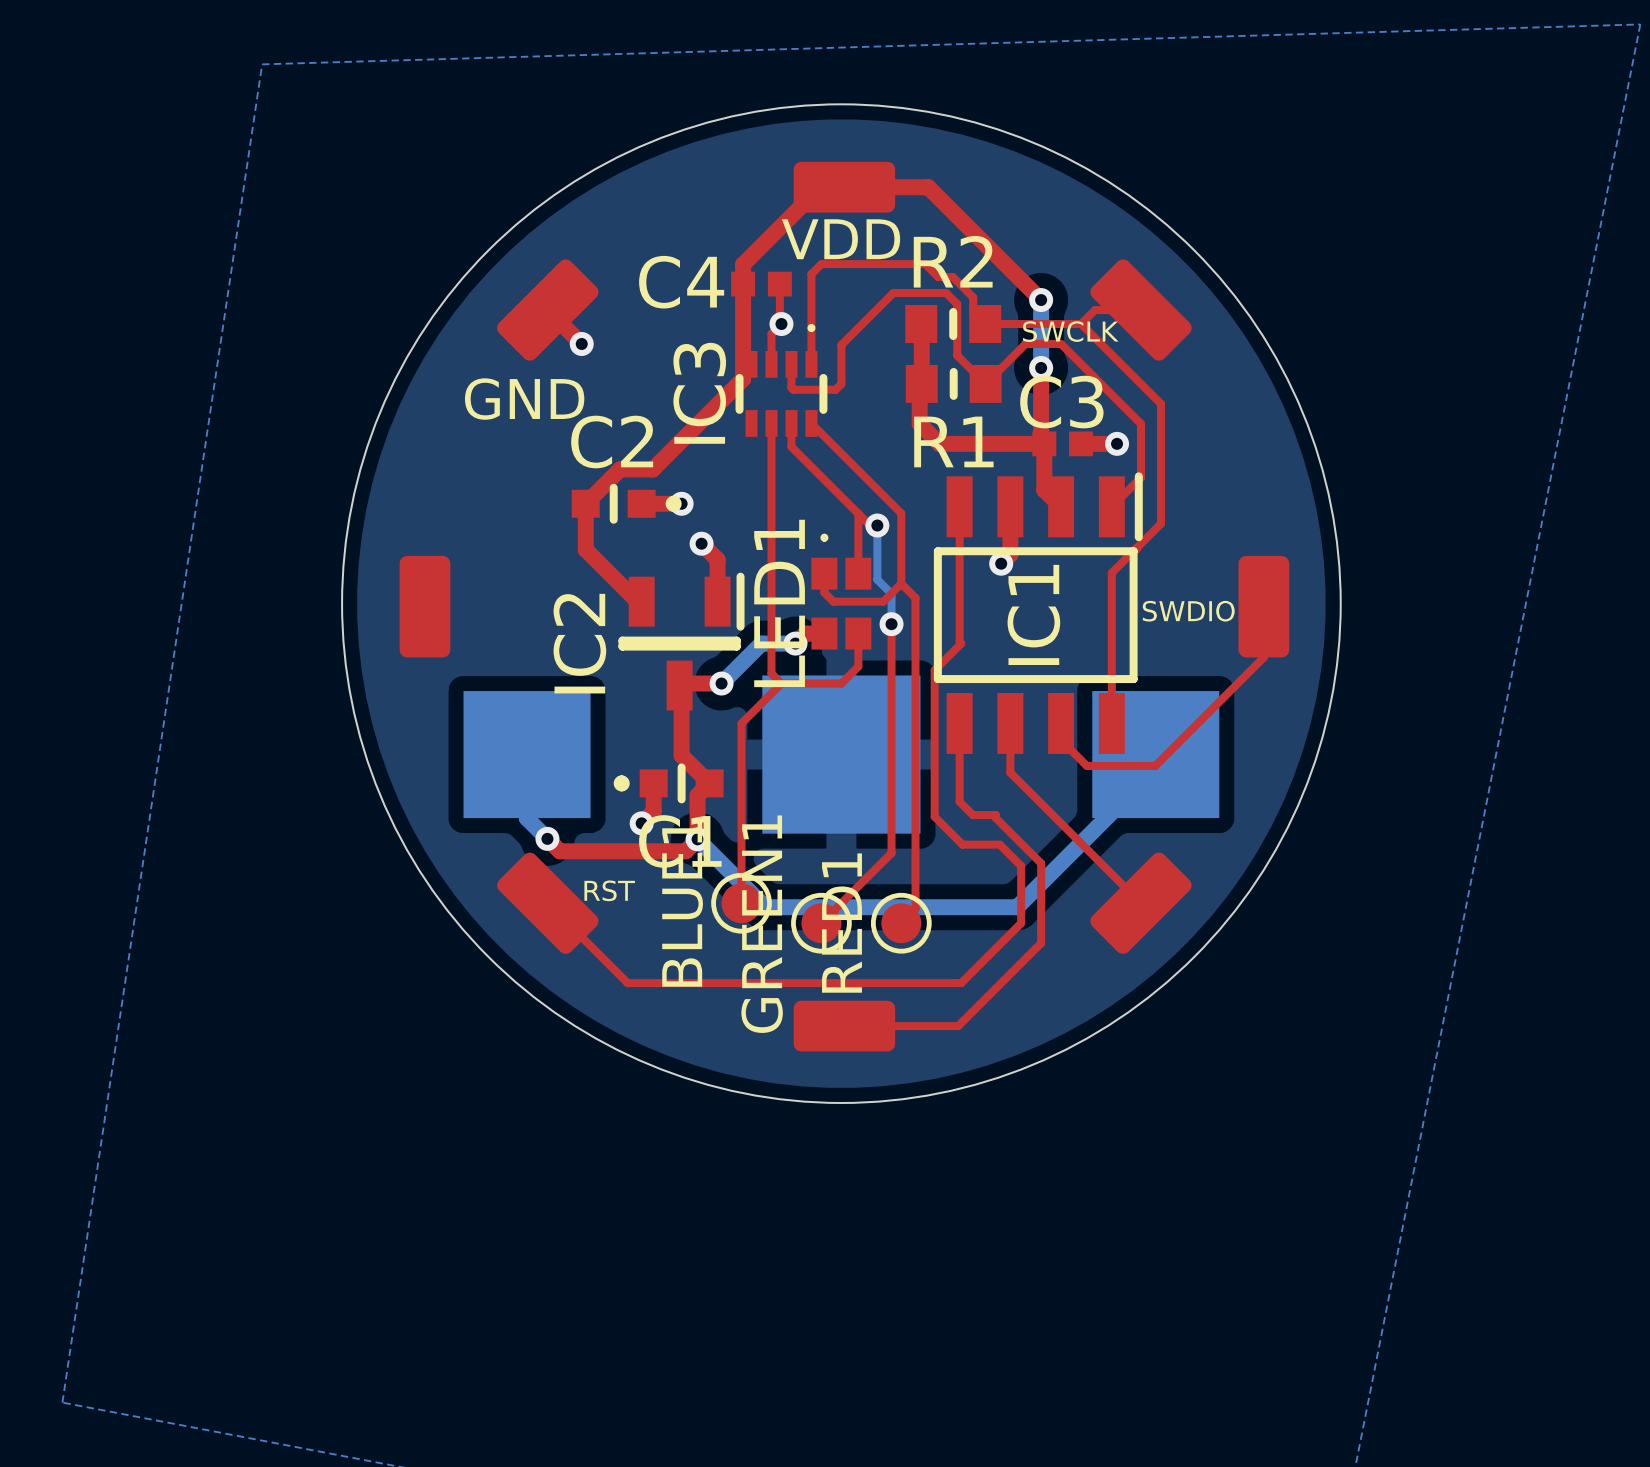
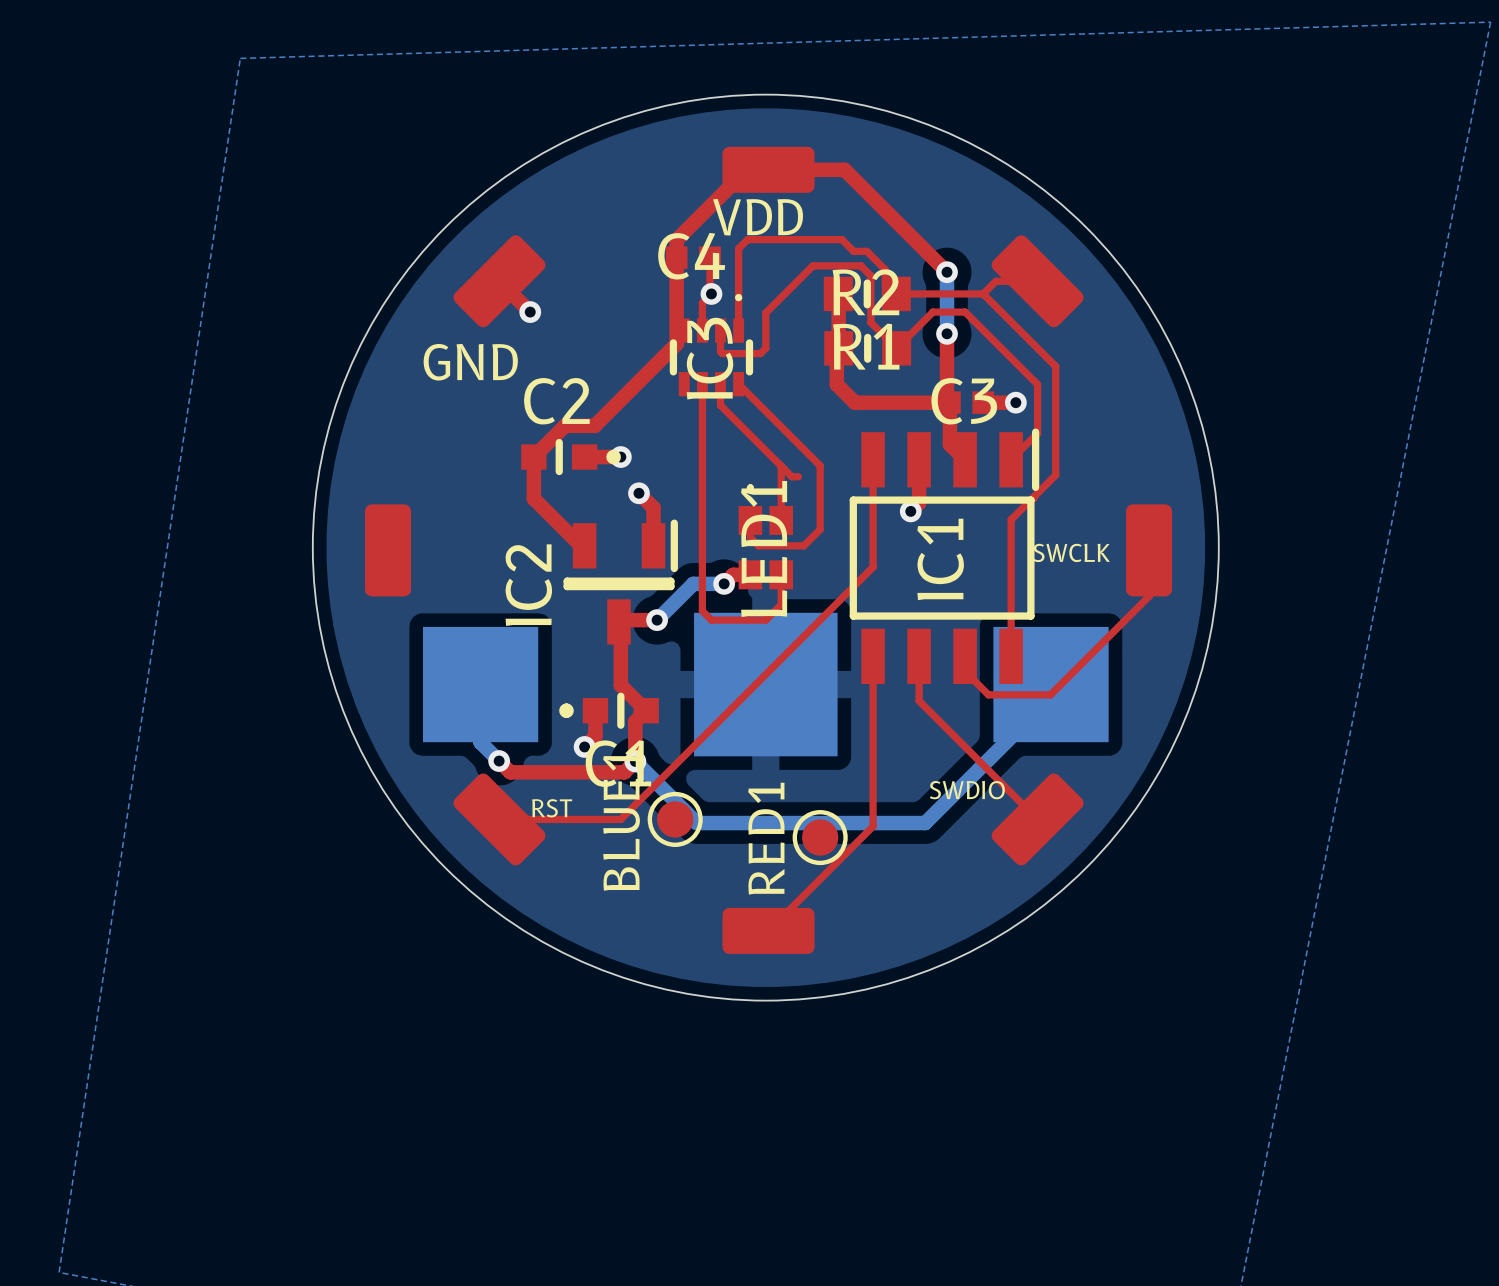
R2 name position: R2 (953, 261) -> R2 (865, 292)
C4 name position: C4 (681, 282) -> C4 (691, 256)
text position: SWCLK (1070, 331) -> SWCLK (1071, 552)
IC3 name position: IC3 (699, 393) -> IC3 (709, 358)
C3 name position: C3 (1061, 402) -> C3 (964, 401)
R1 name position: R1 (953, 441) -> R1 (866, 346)
bottom track: (877, 525) (877, 579) (891, 593) (891, 624) -> none
via: (877, 525) -> none
top track: (901, 583) (915, 597) (915, 909) (901, 923) -> none
LED1 name position: LED1 (779, 603) -> LED1 (764, 549)
text position: SWDIO (1188, 611) -> SWDIO (967, 790)
top track: (891, 624) (891, 853) (821, 923) -> none
via: (891, 624) -> none
top track: (959, 625) (961, 643) (934, 670) (934, 816) (962, 844) (999, 844) (1021, 865) (1021, 923) (961, 983) (627, 983) (547, 903) -> (873, 567) (620, 819) (499, 819)
top track: (781, 683) (741, 723) (741, 903) -> none
top track: (959, 801) (972, 815) (995, 815) (995, 817) (1041, 863) (1041, 943) (958, 1026) (844, 1026) -> (873, 727) (873, 826) (768, 930)
GREEN1: (821, 923) -> none

